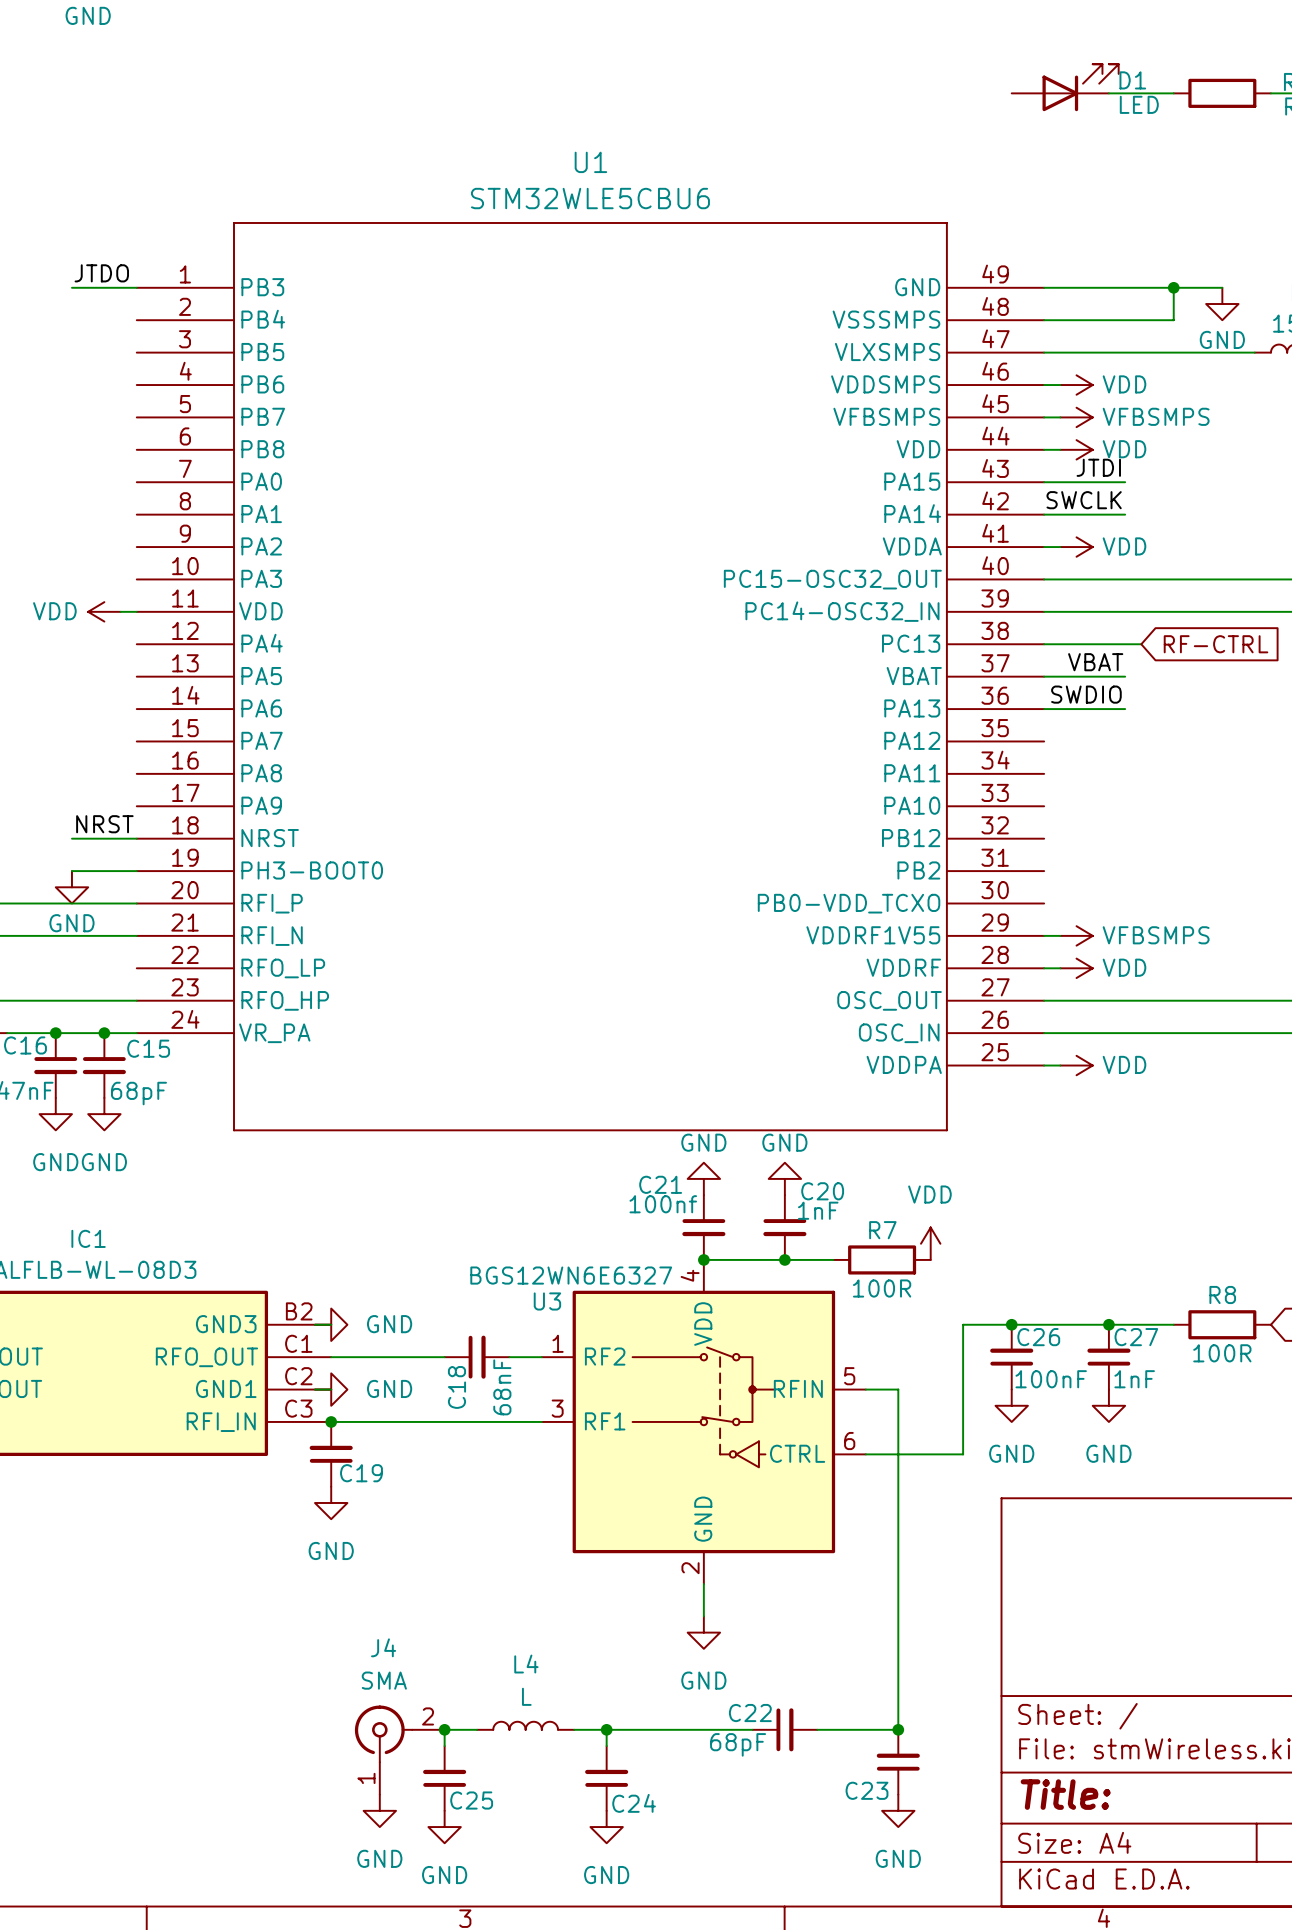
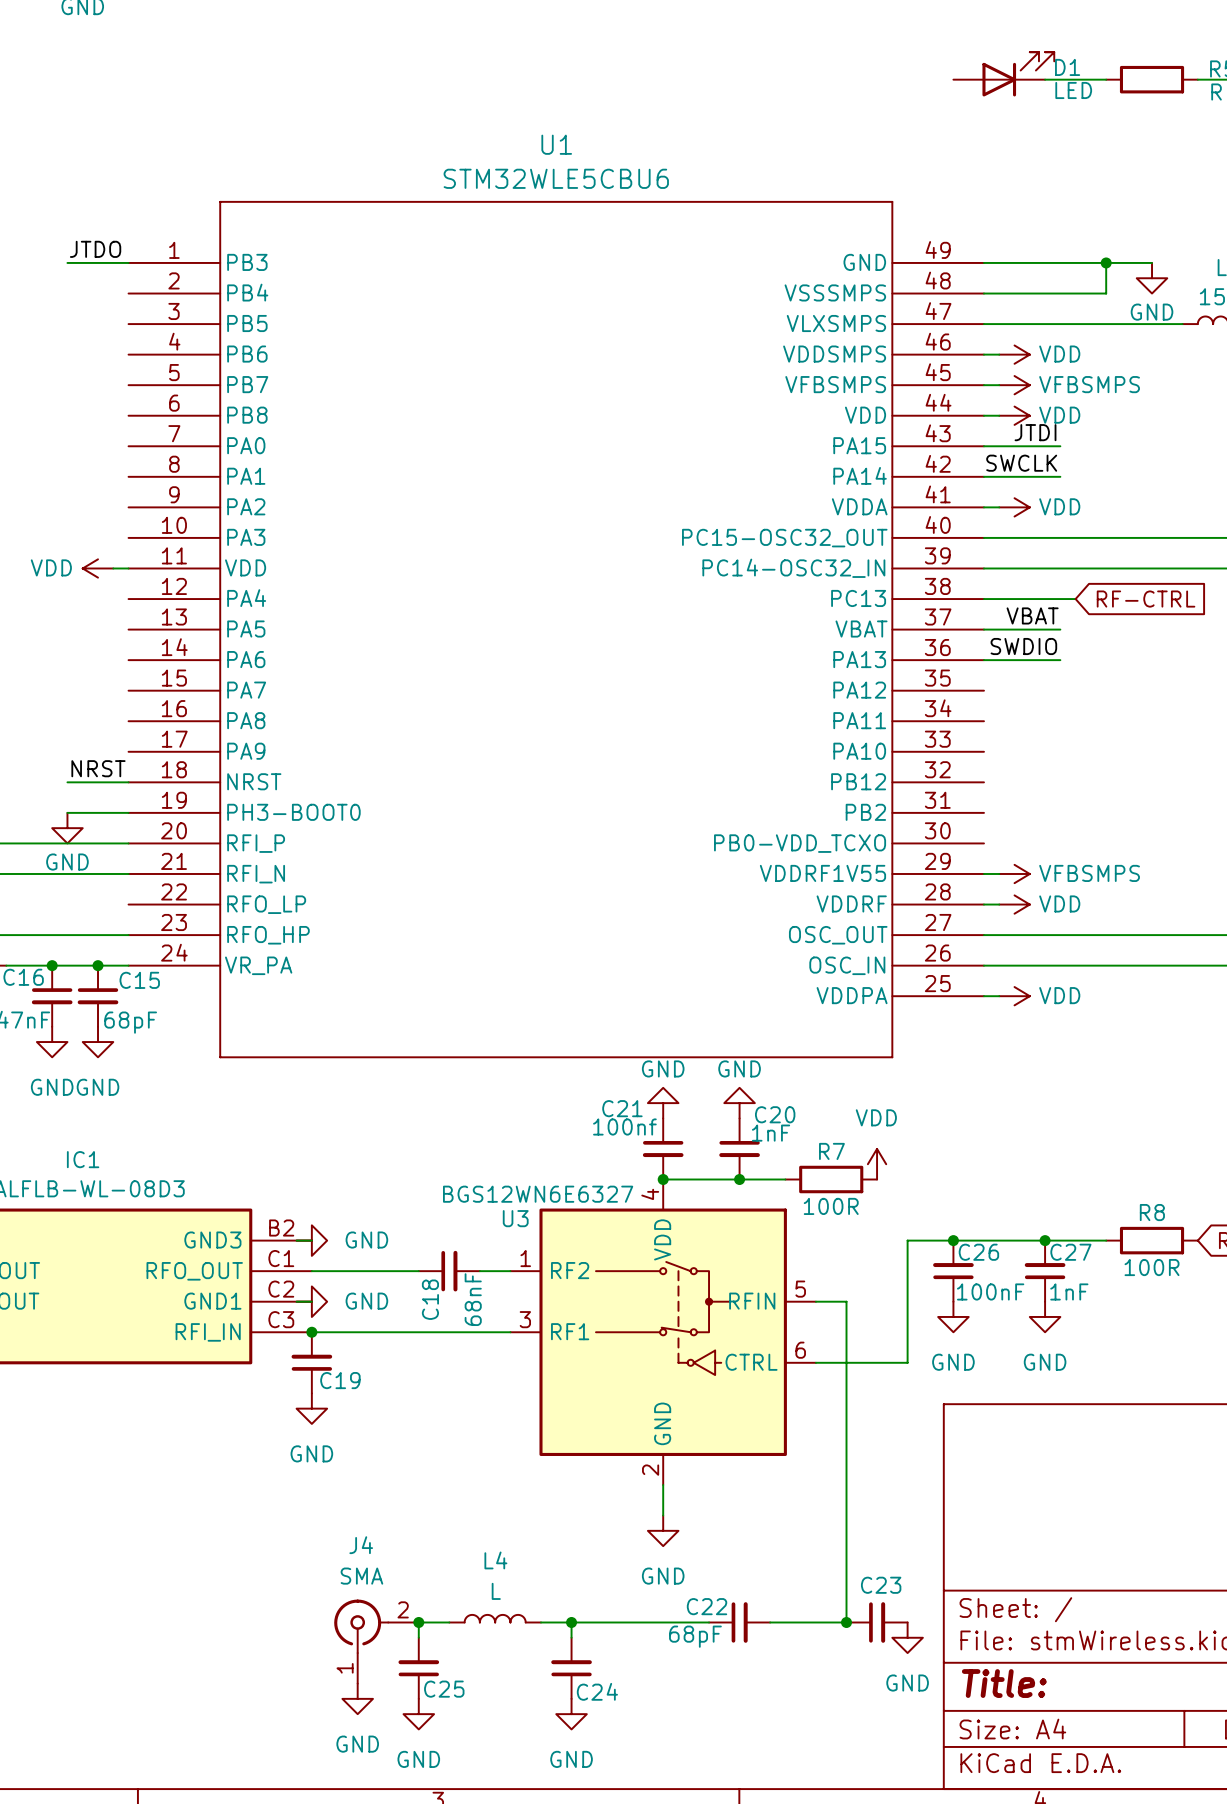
C23 rotation: 0° (898, 1762) -> 90° clockwise (877, 1622)
C23 position: (898, 1762) -> (877, 1622)
C23 name position: C23 (867, 1790) -> C23 (881, 1585)
power symbol position: GND (898, 1810) -> GND (907, 1637)

